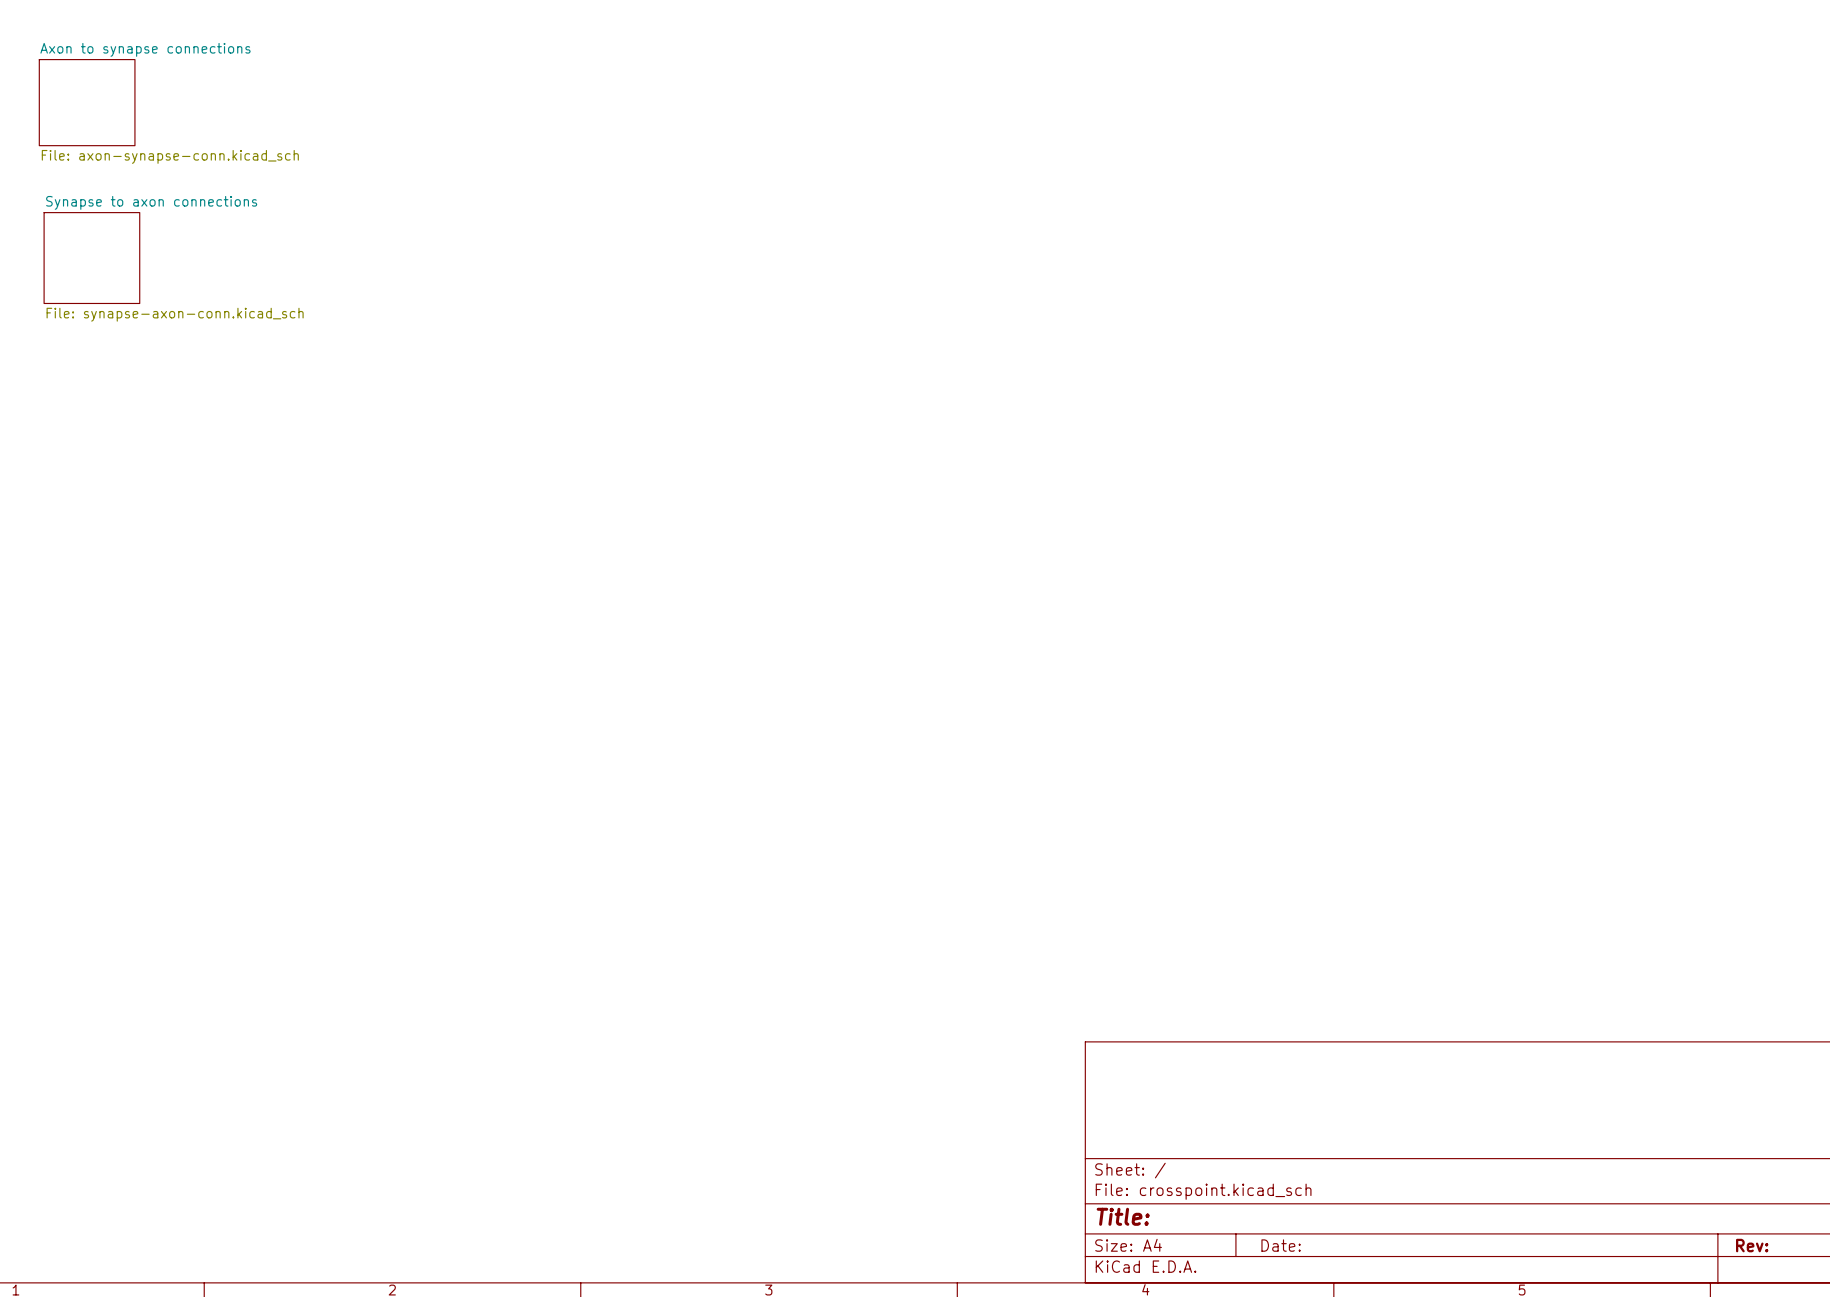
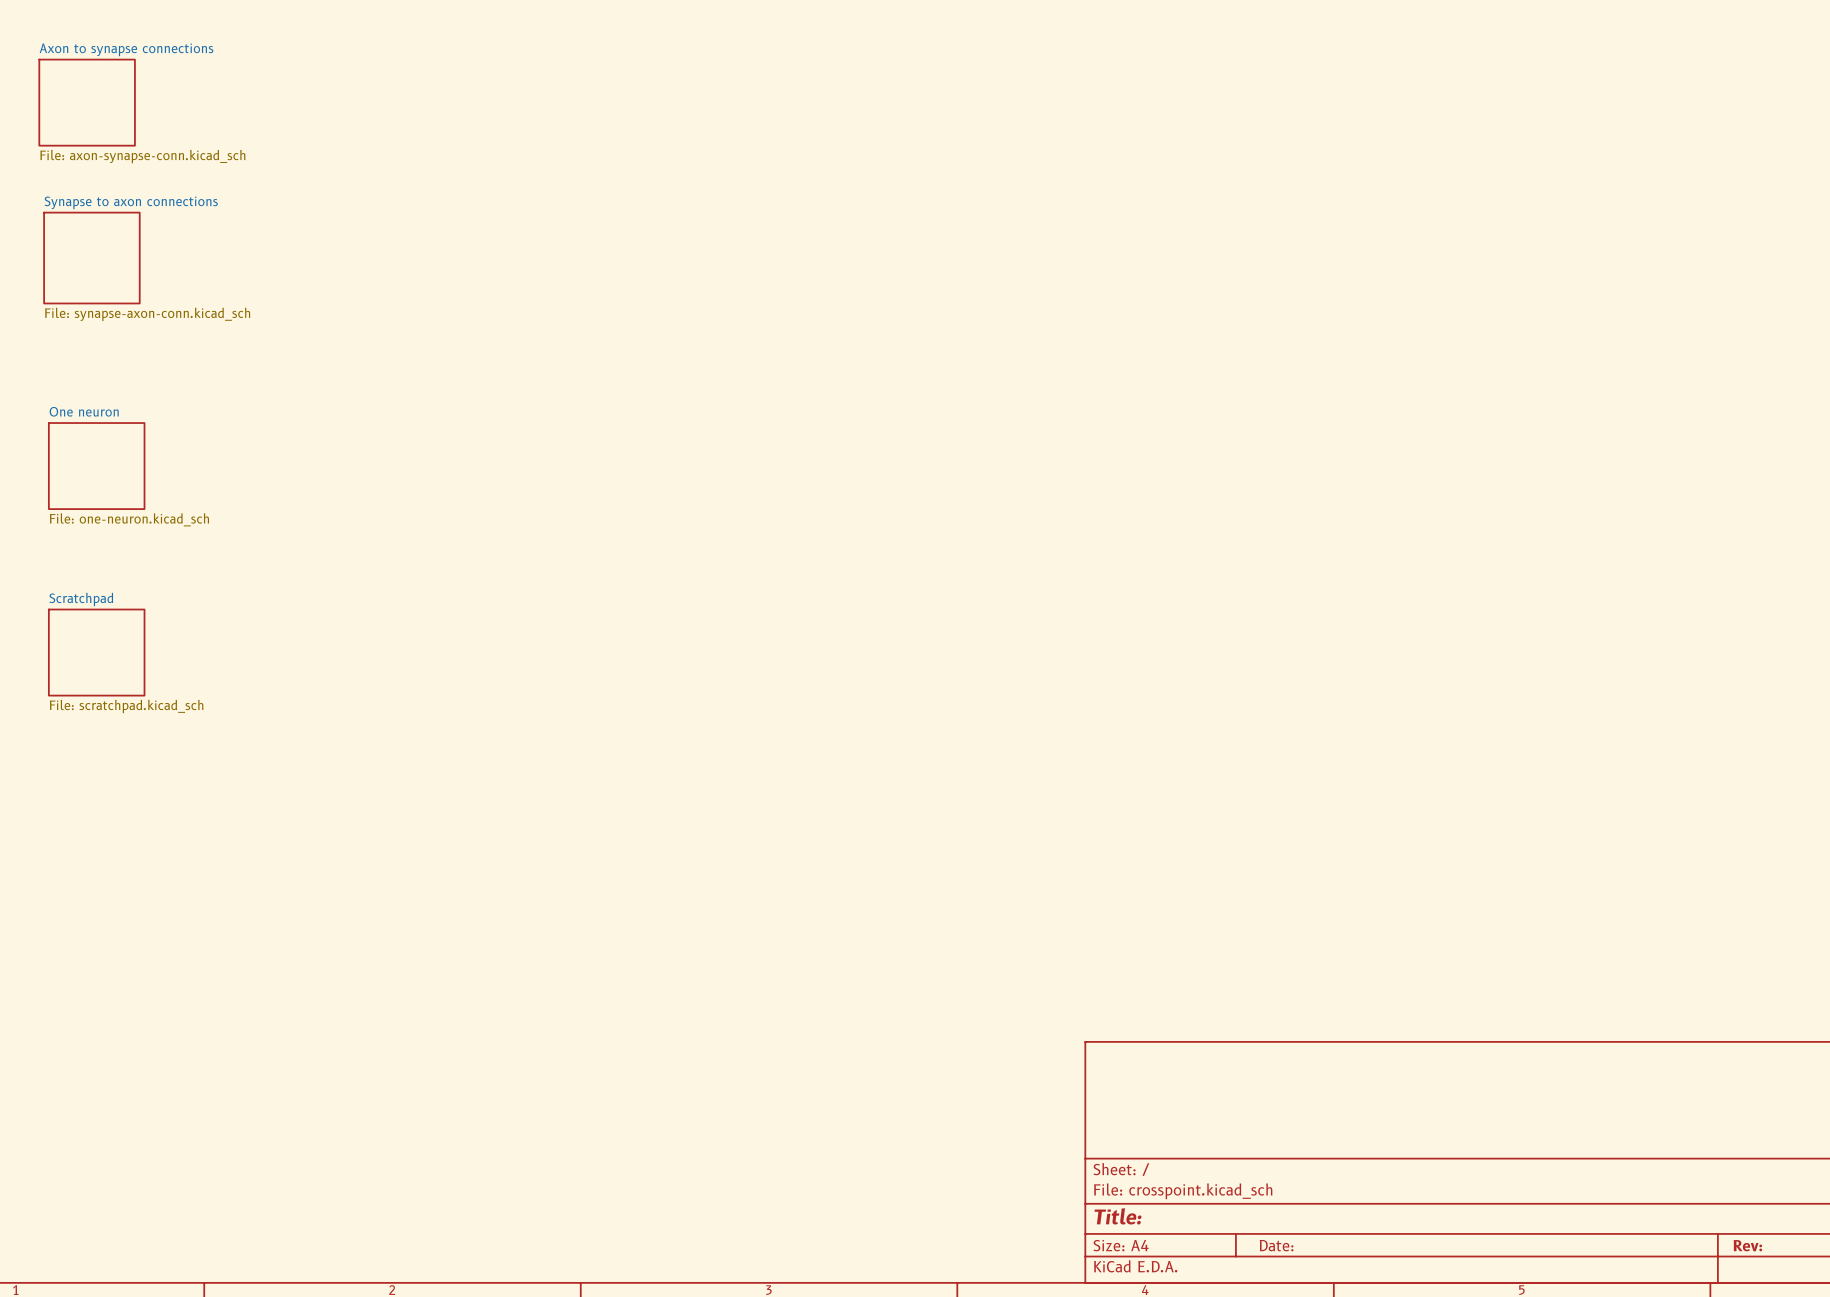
sheet One neuron: none -> File: one-neuron.kicad_sch (96, 466)
sheet Scratchpad: none -> File: scratchpad.kicad_sch (96, 652)

